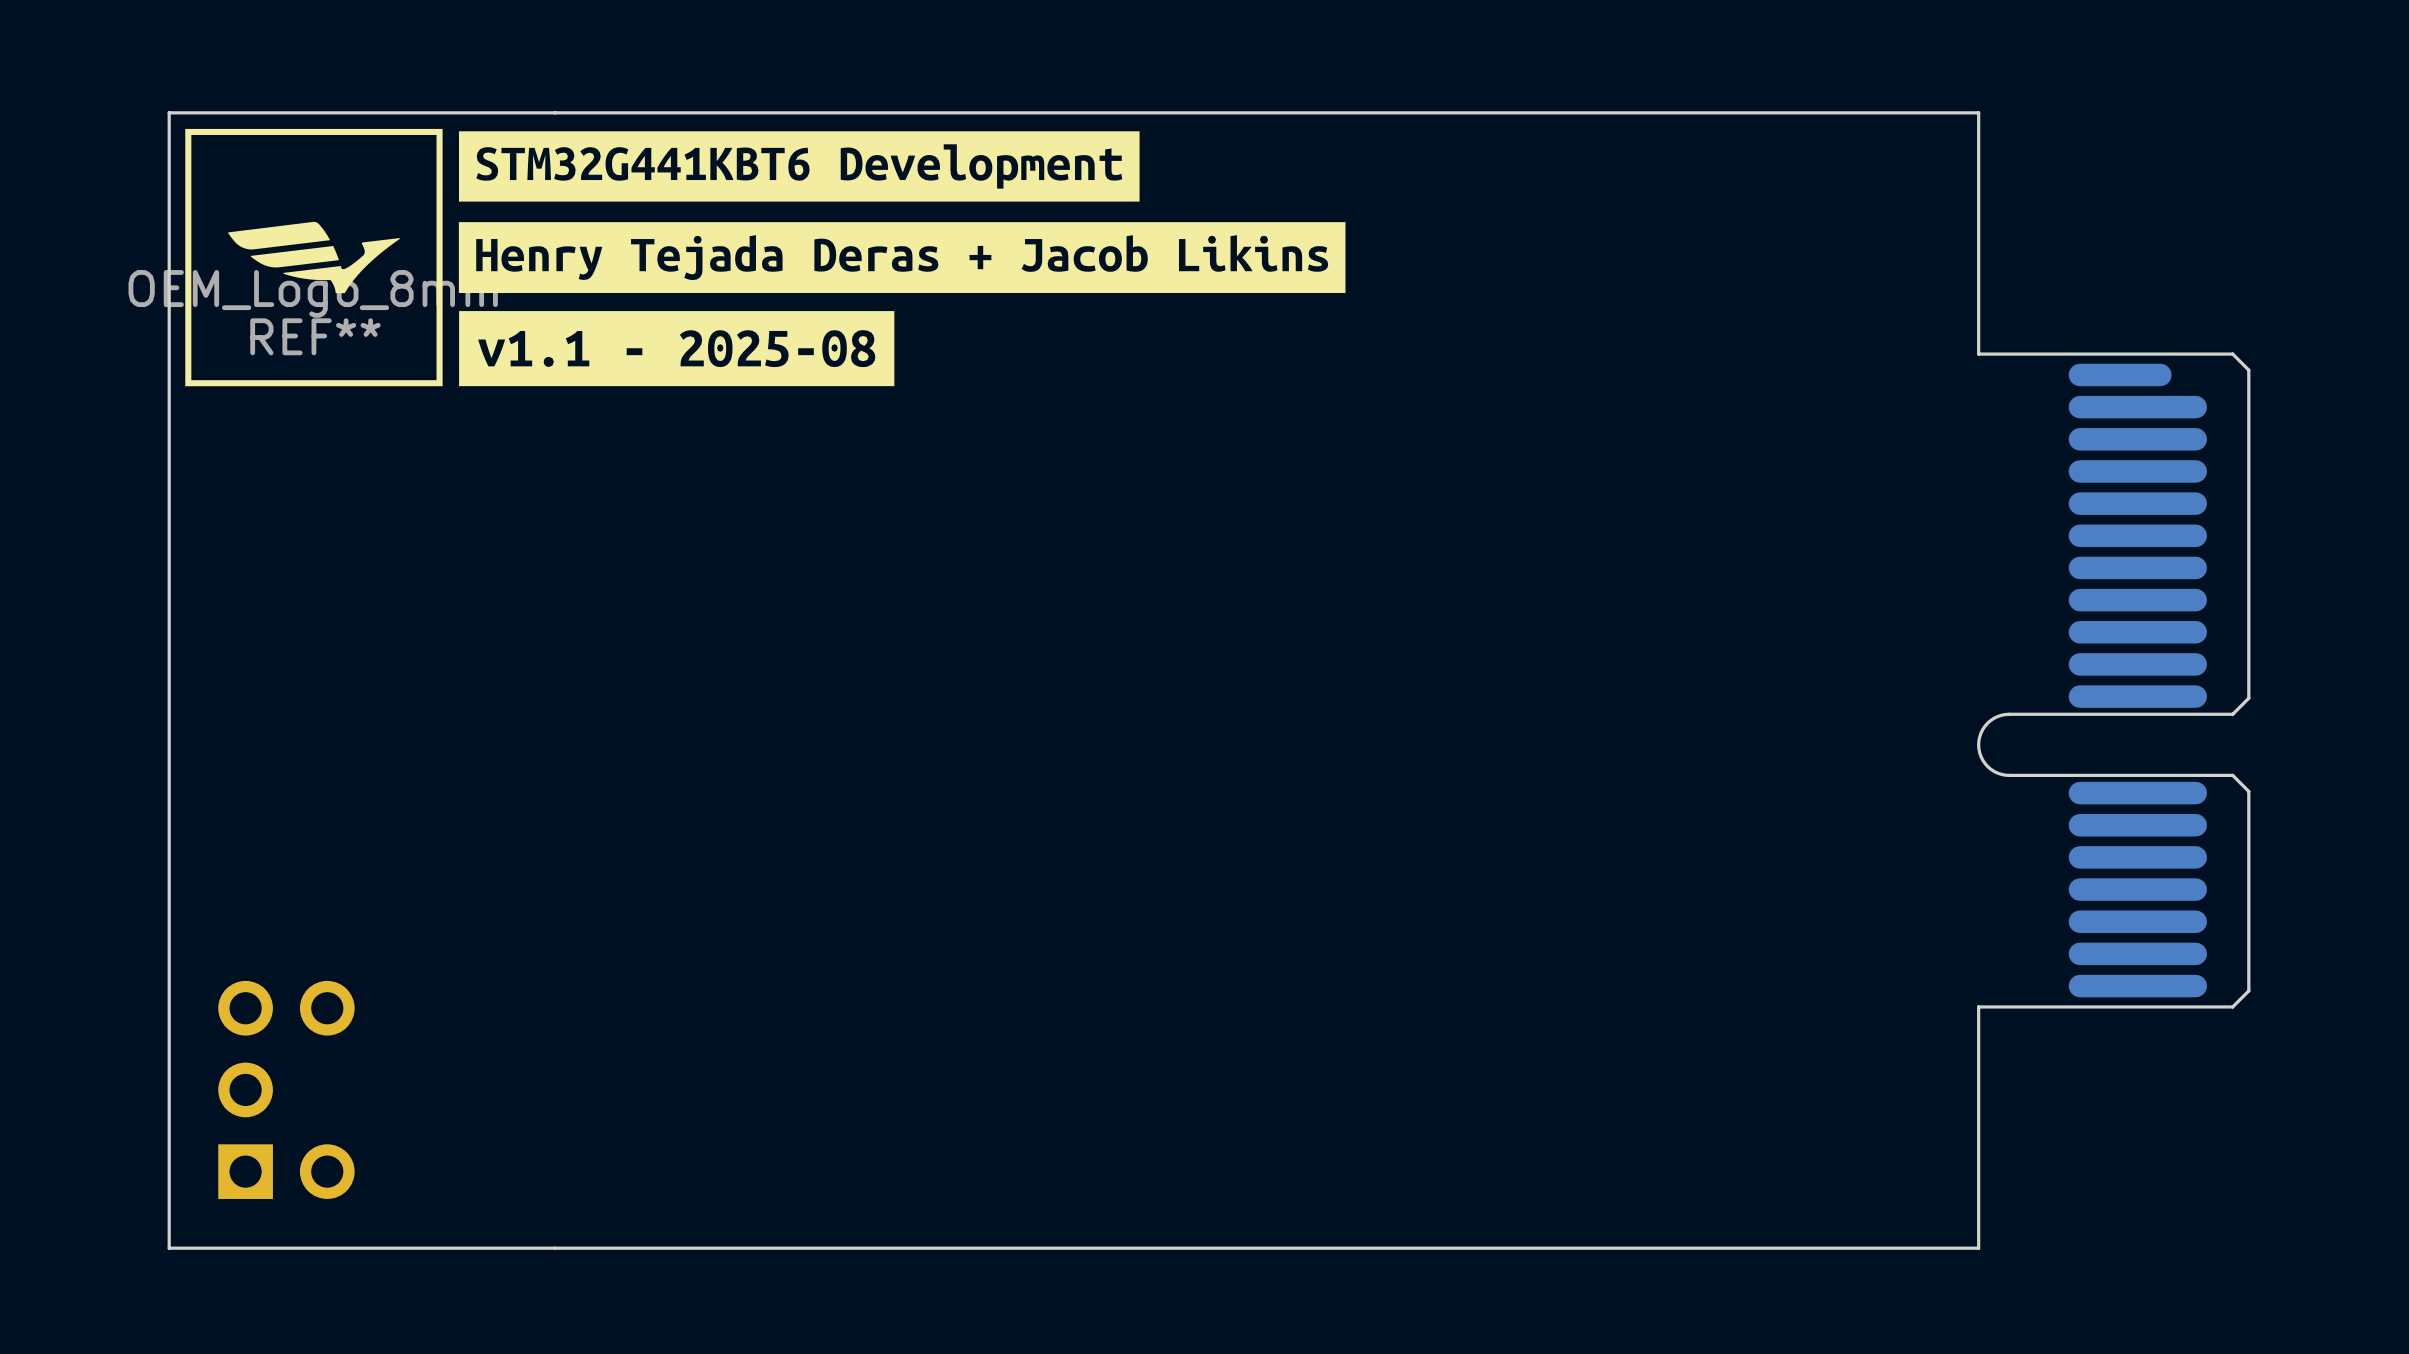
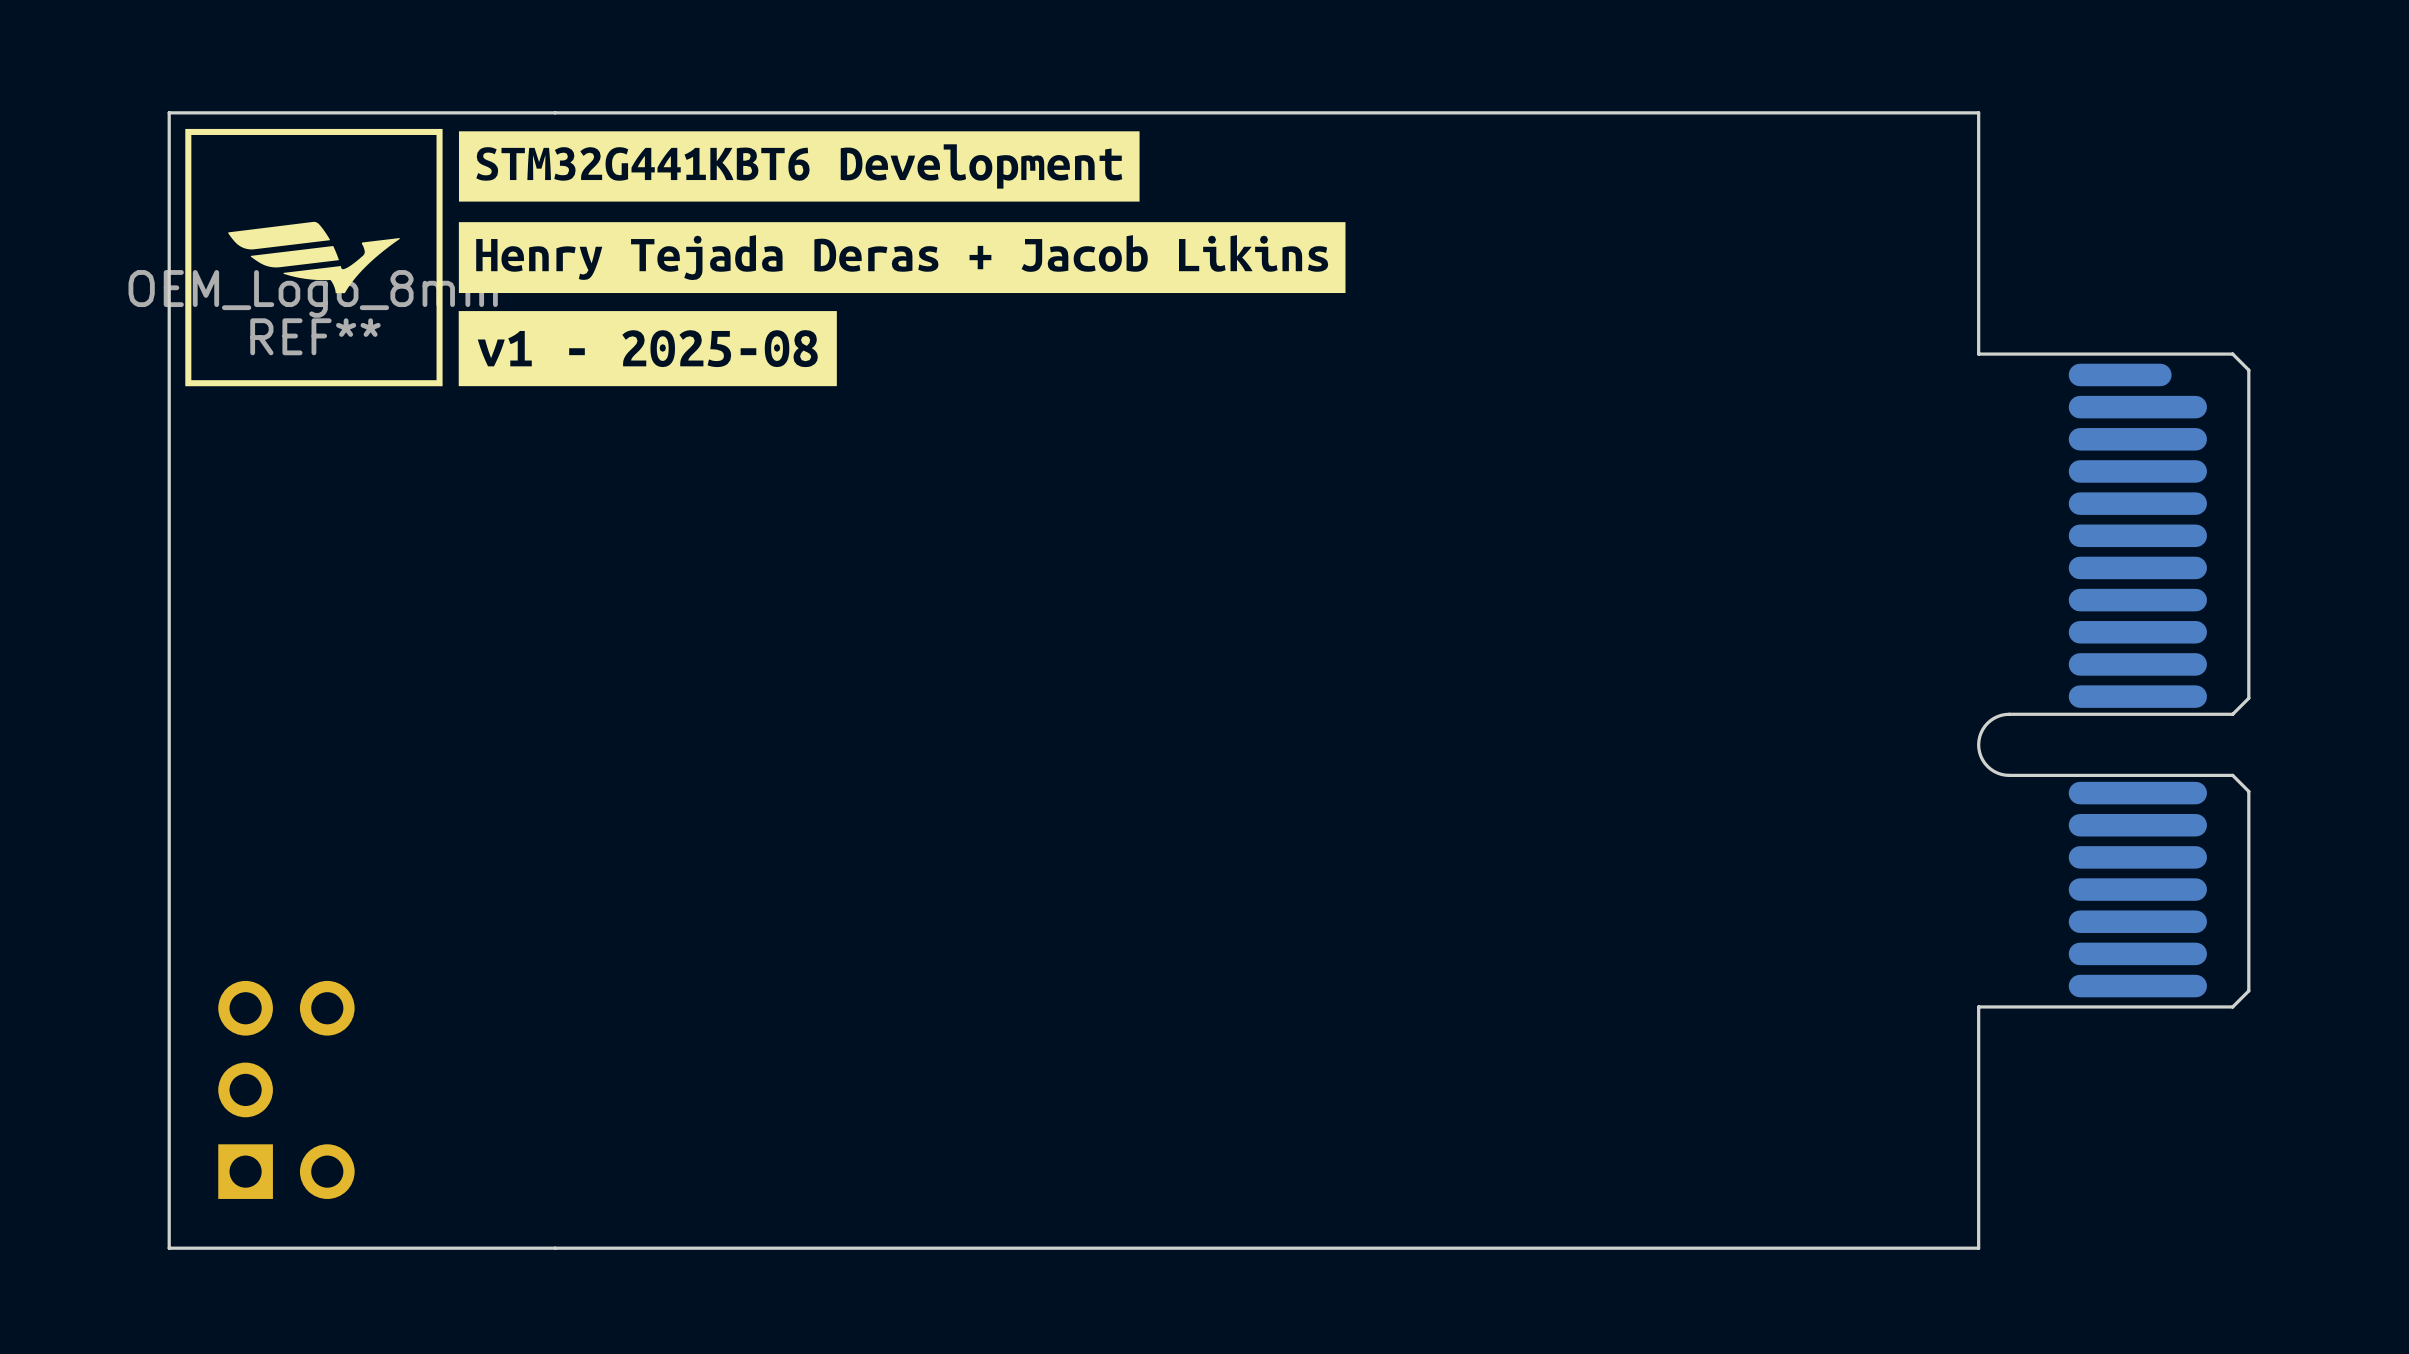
drawing shape: [459, 311, 895, 387] -> [458, 311, 837, 387]

